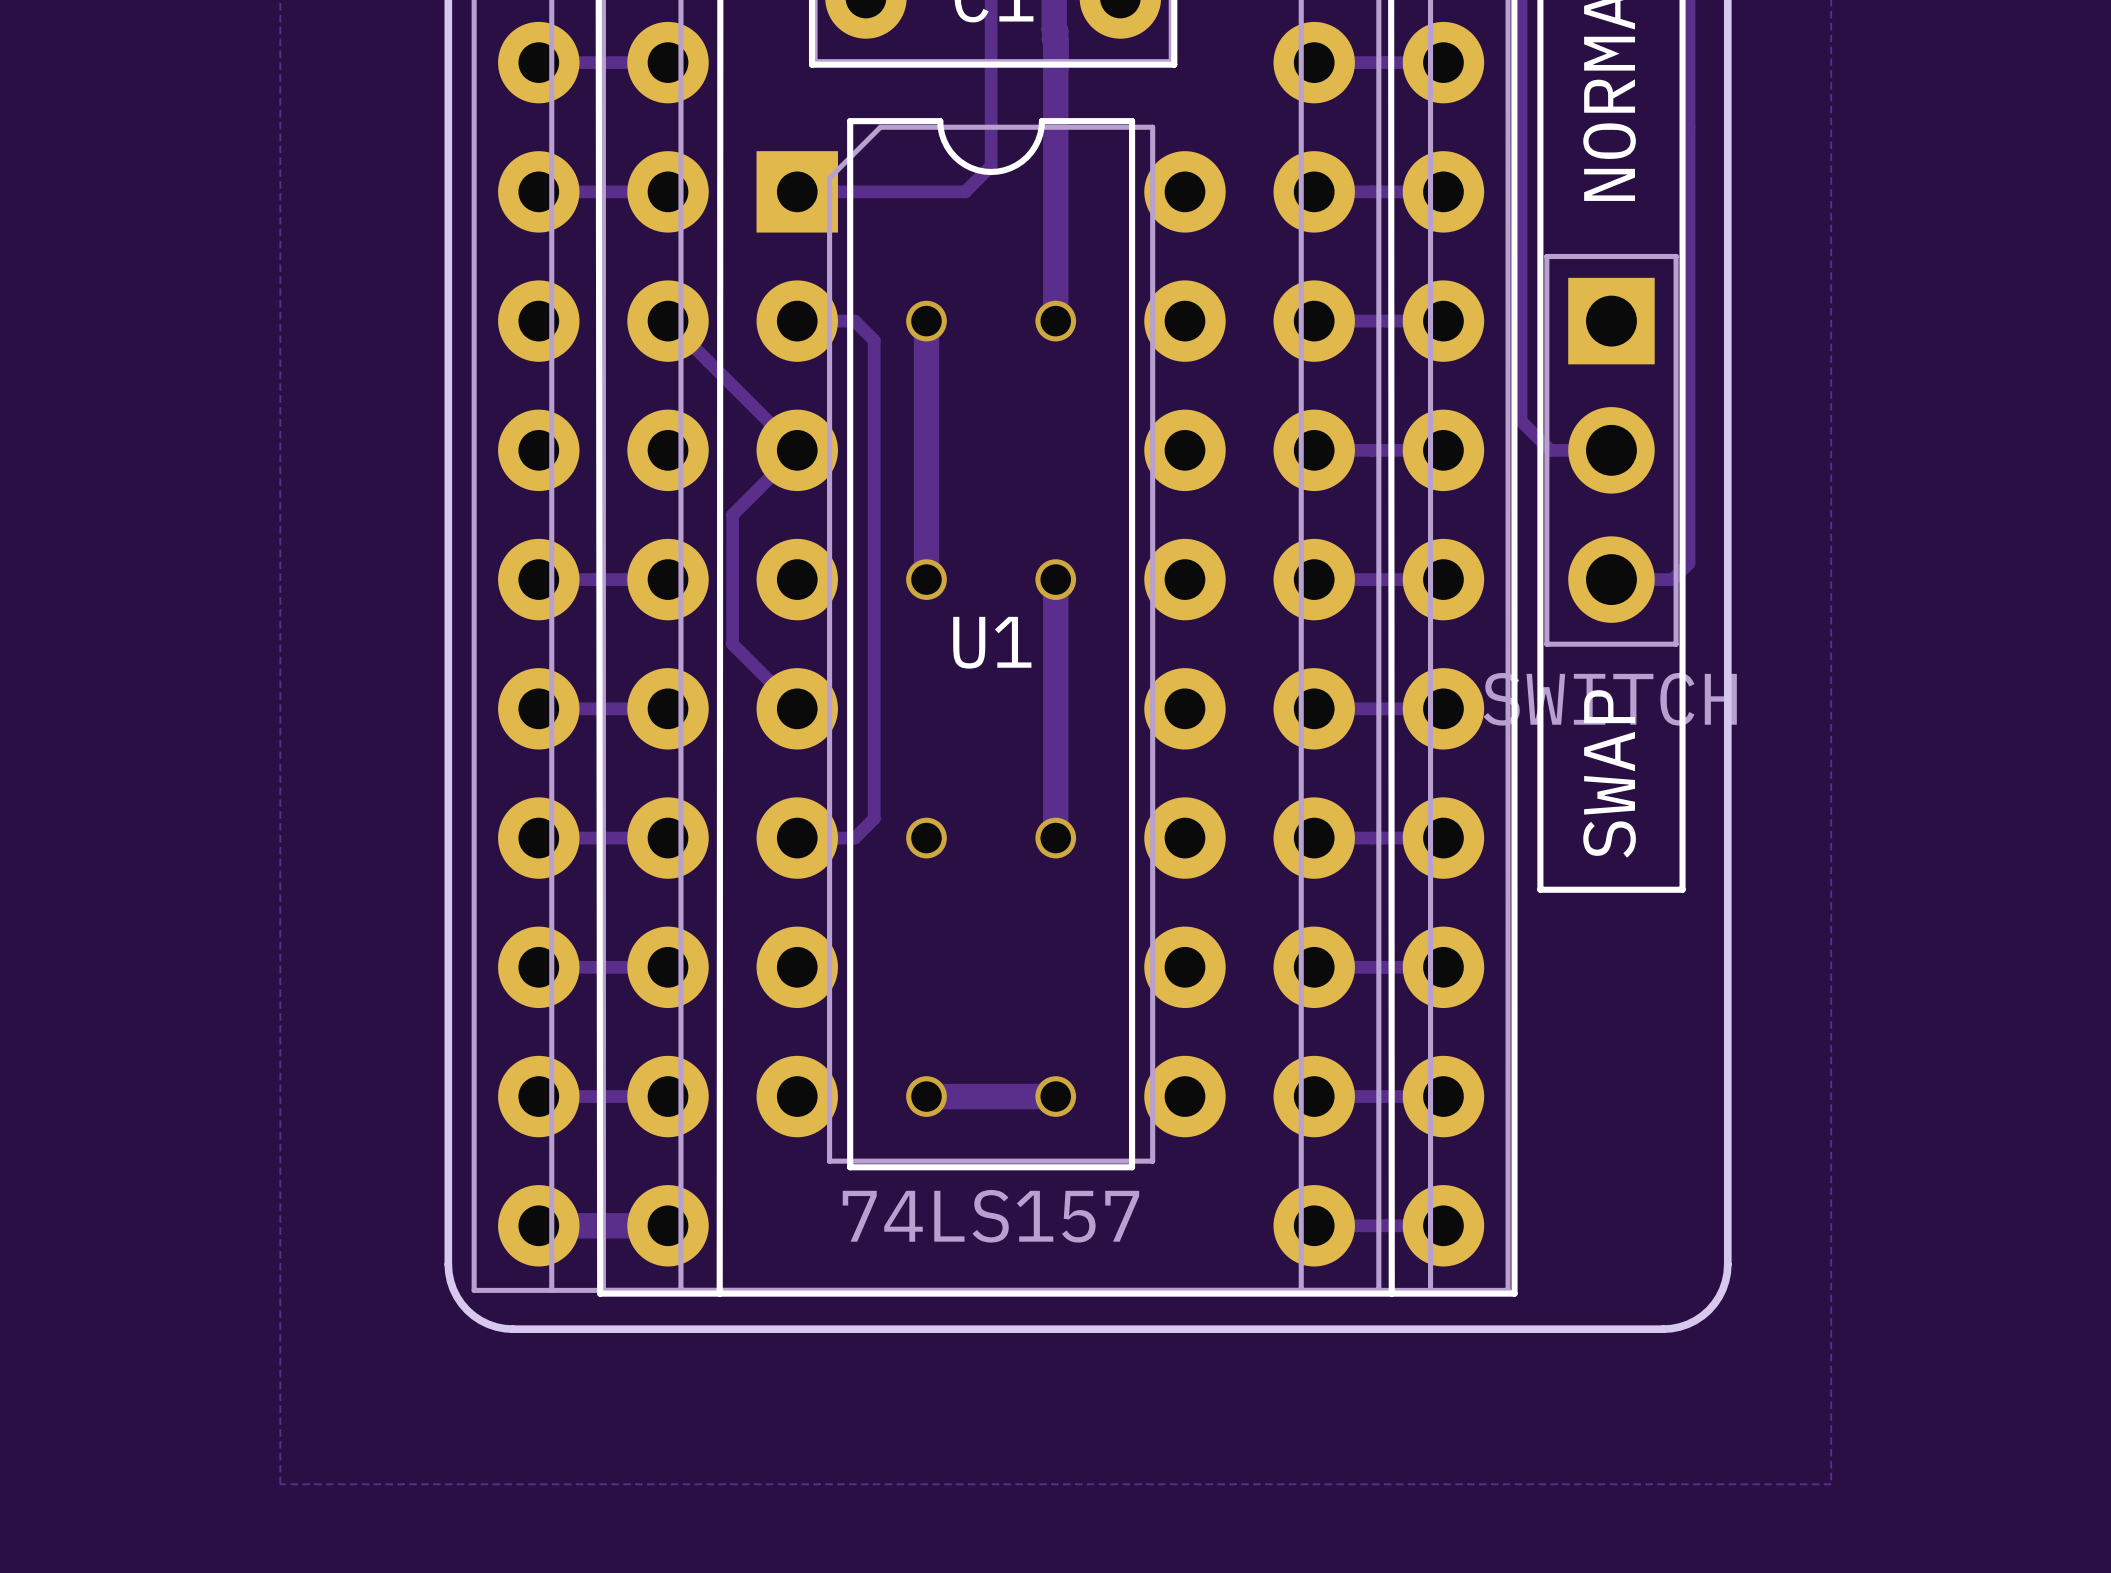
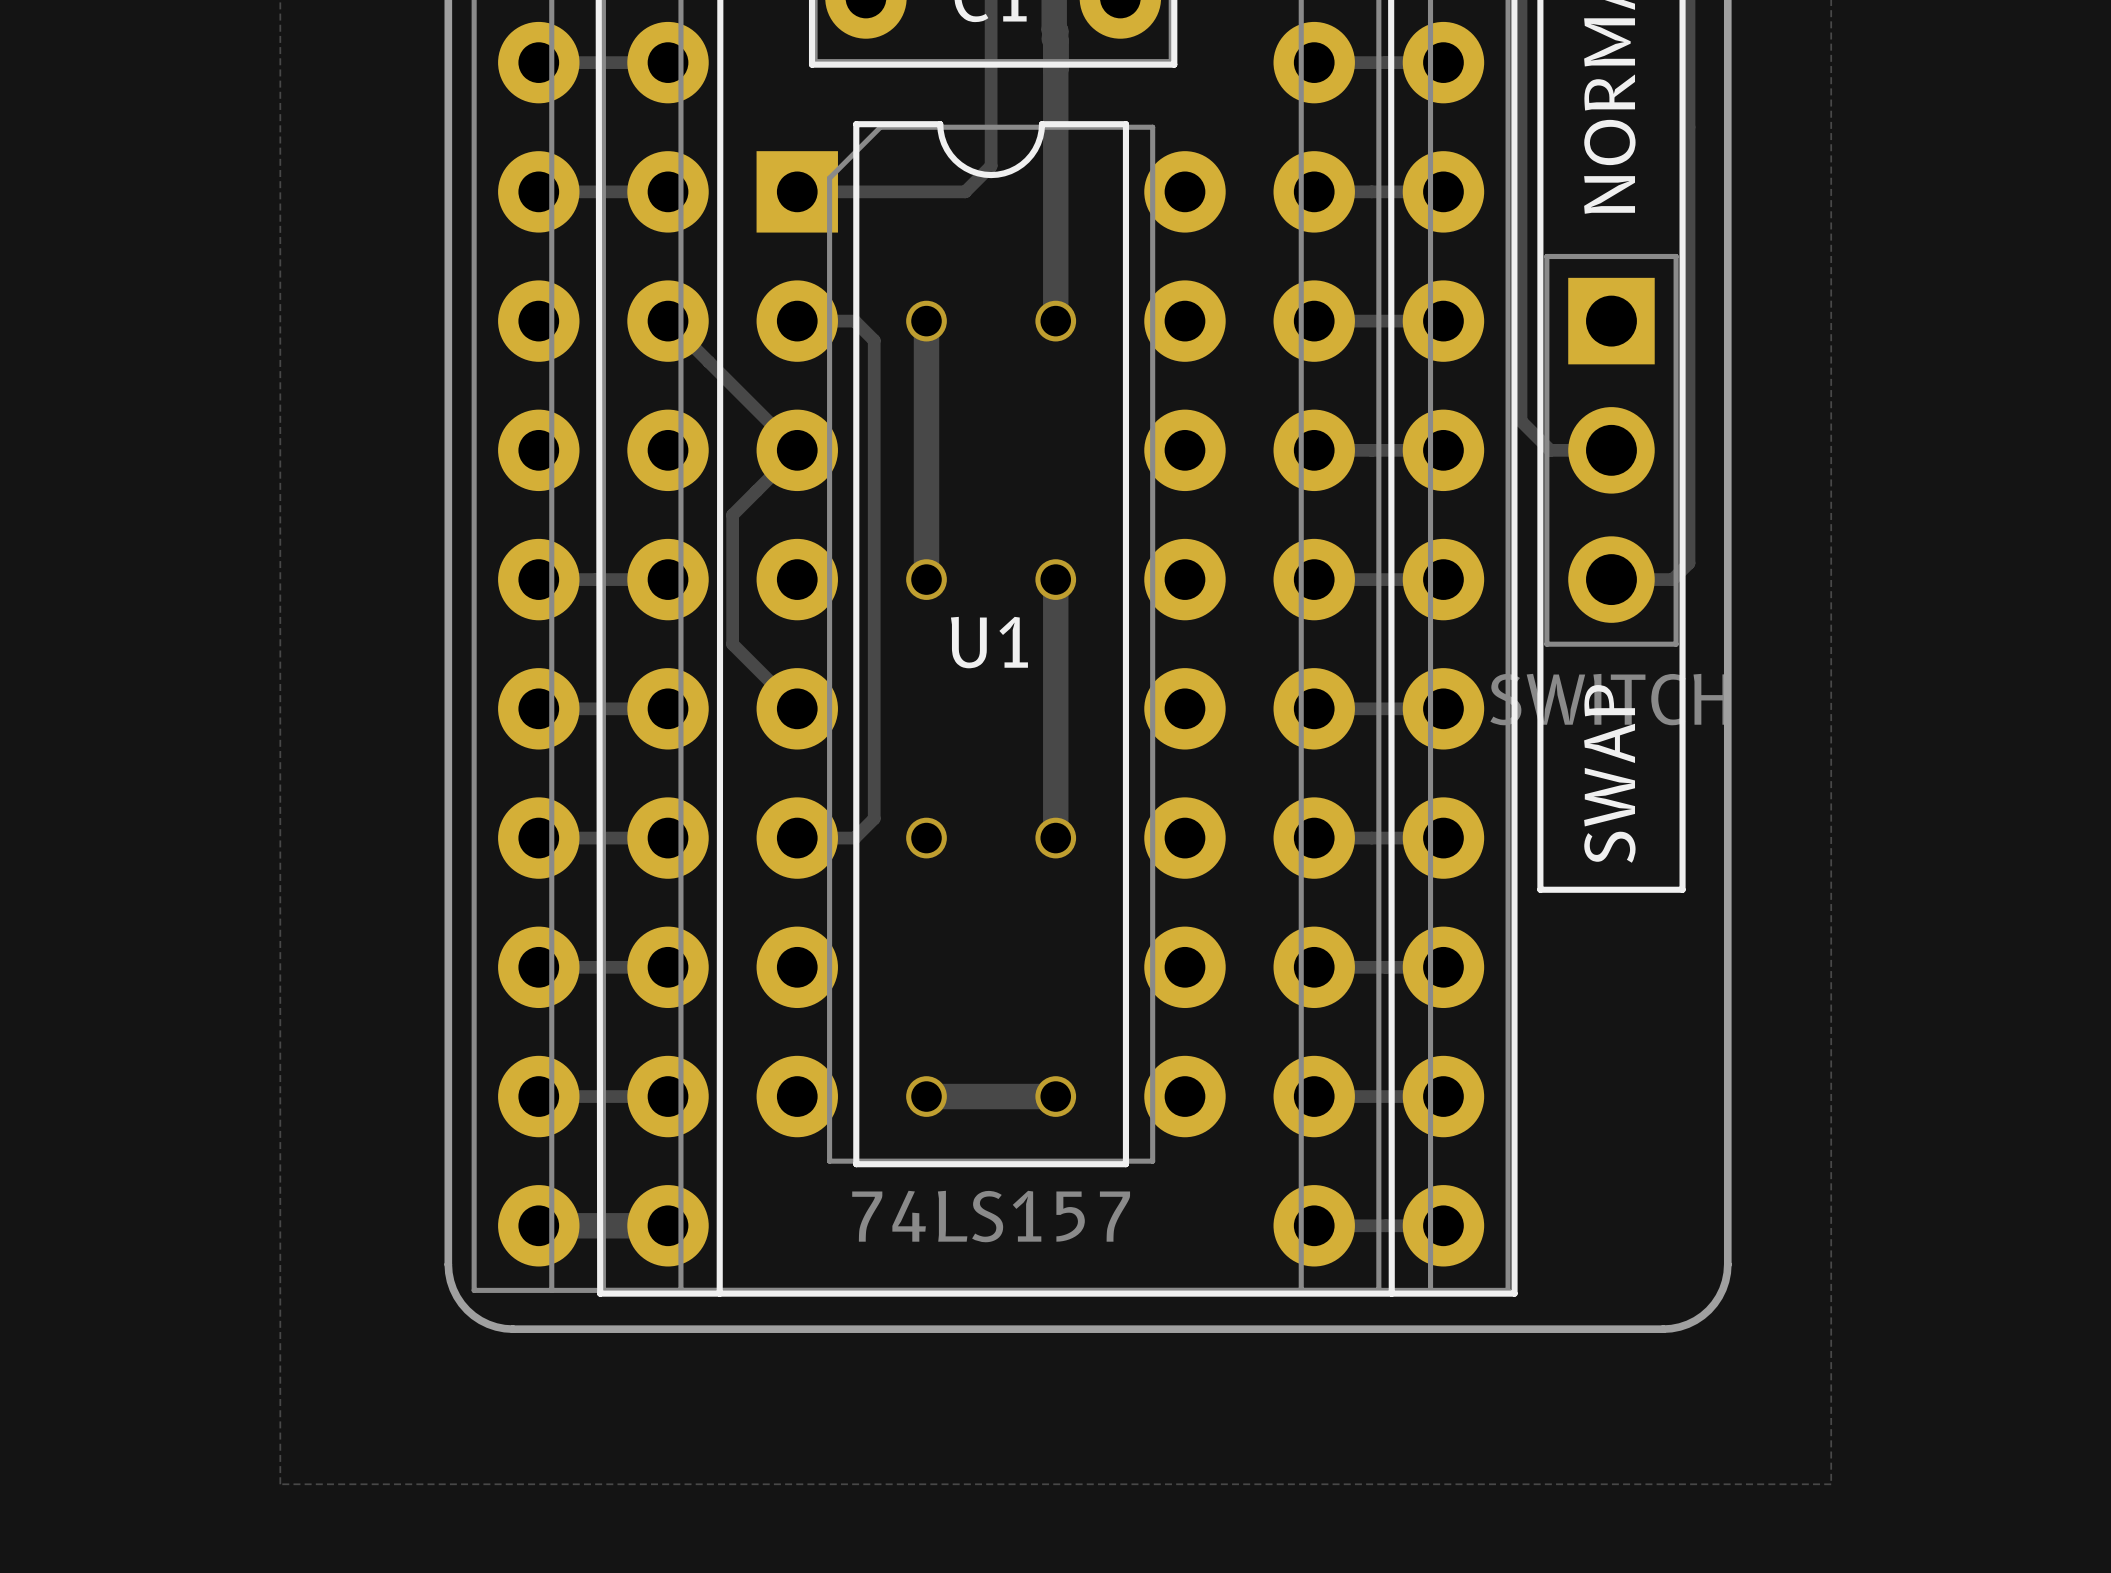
U1 footprint: [756, 118, 1226, 1171] -> [756, 121, 1226, 1168]

